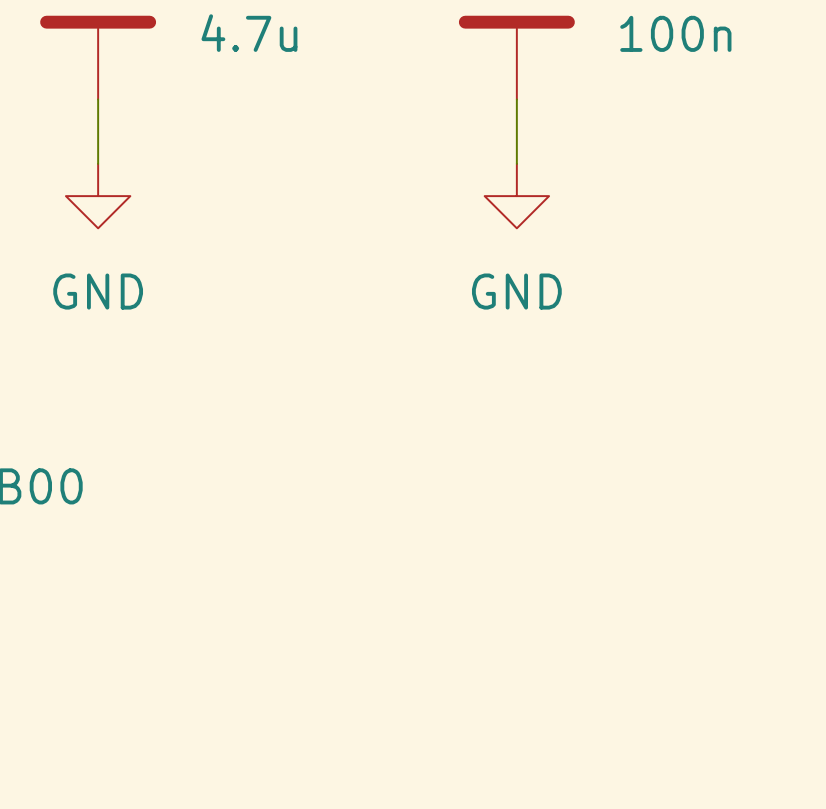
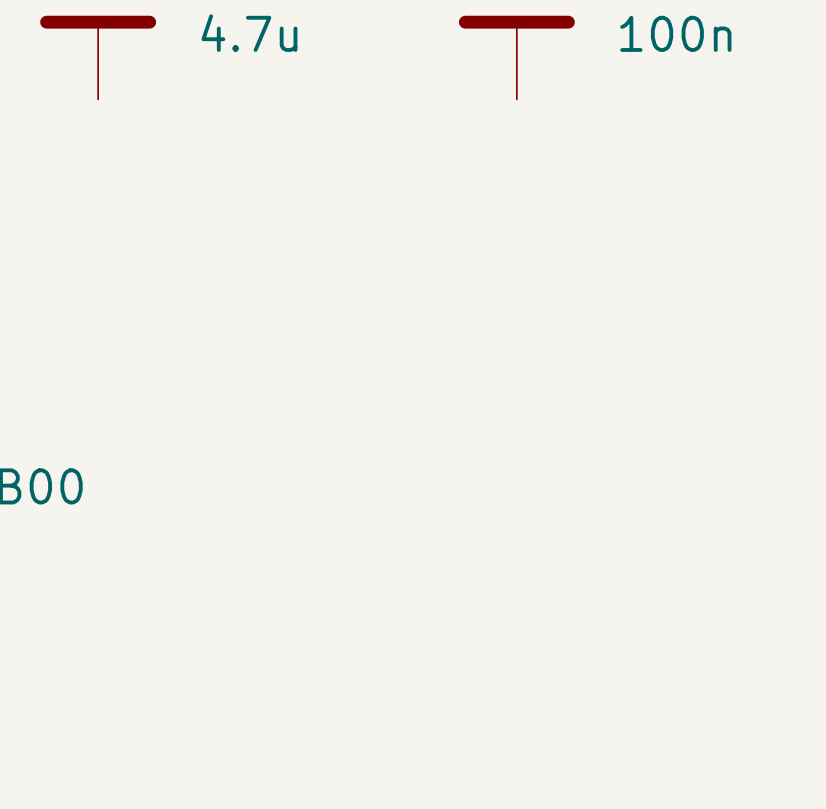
wire: (98, 99) (98, 163) -> none
wire: (516, 99) (516, 163) -> none
power symbol: GND (98, 196) -> none
power symbol: GND (516, 196) -> none

